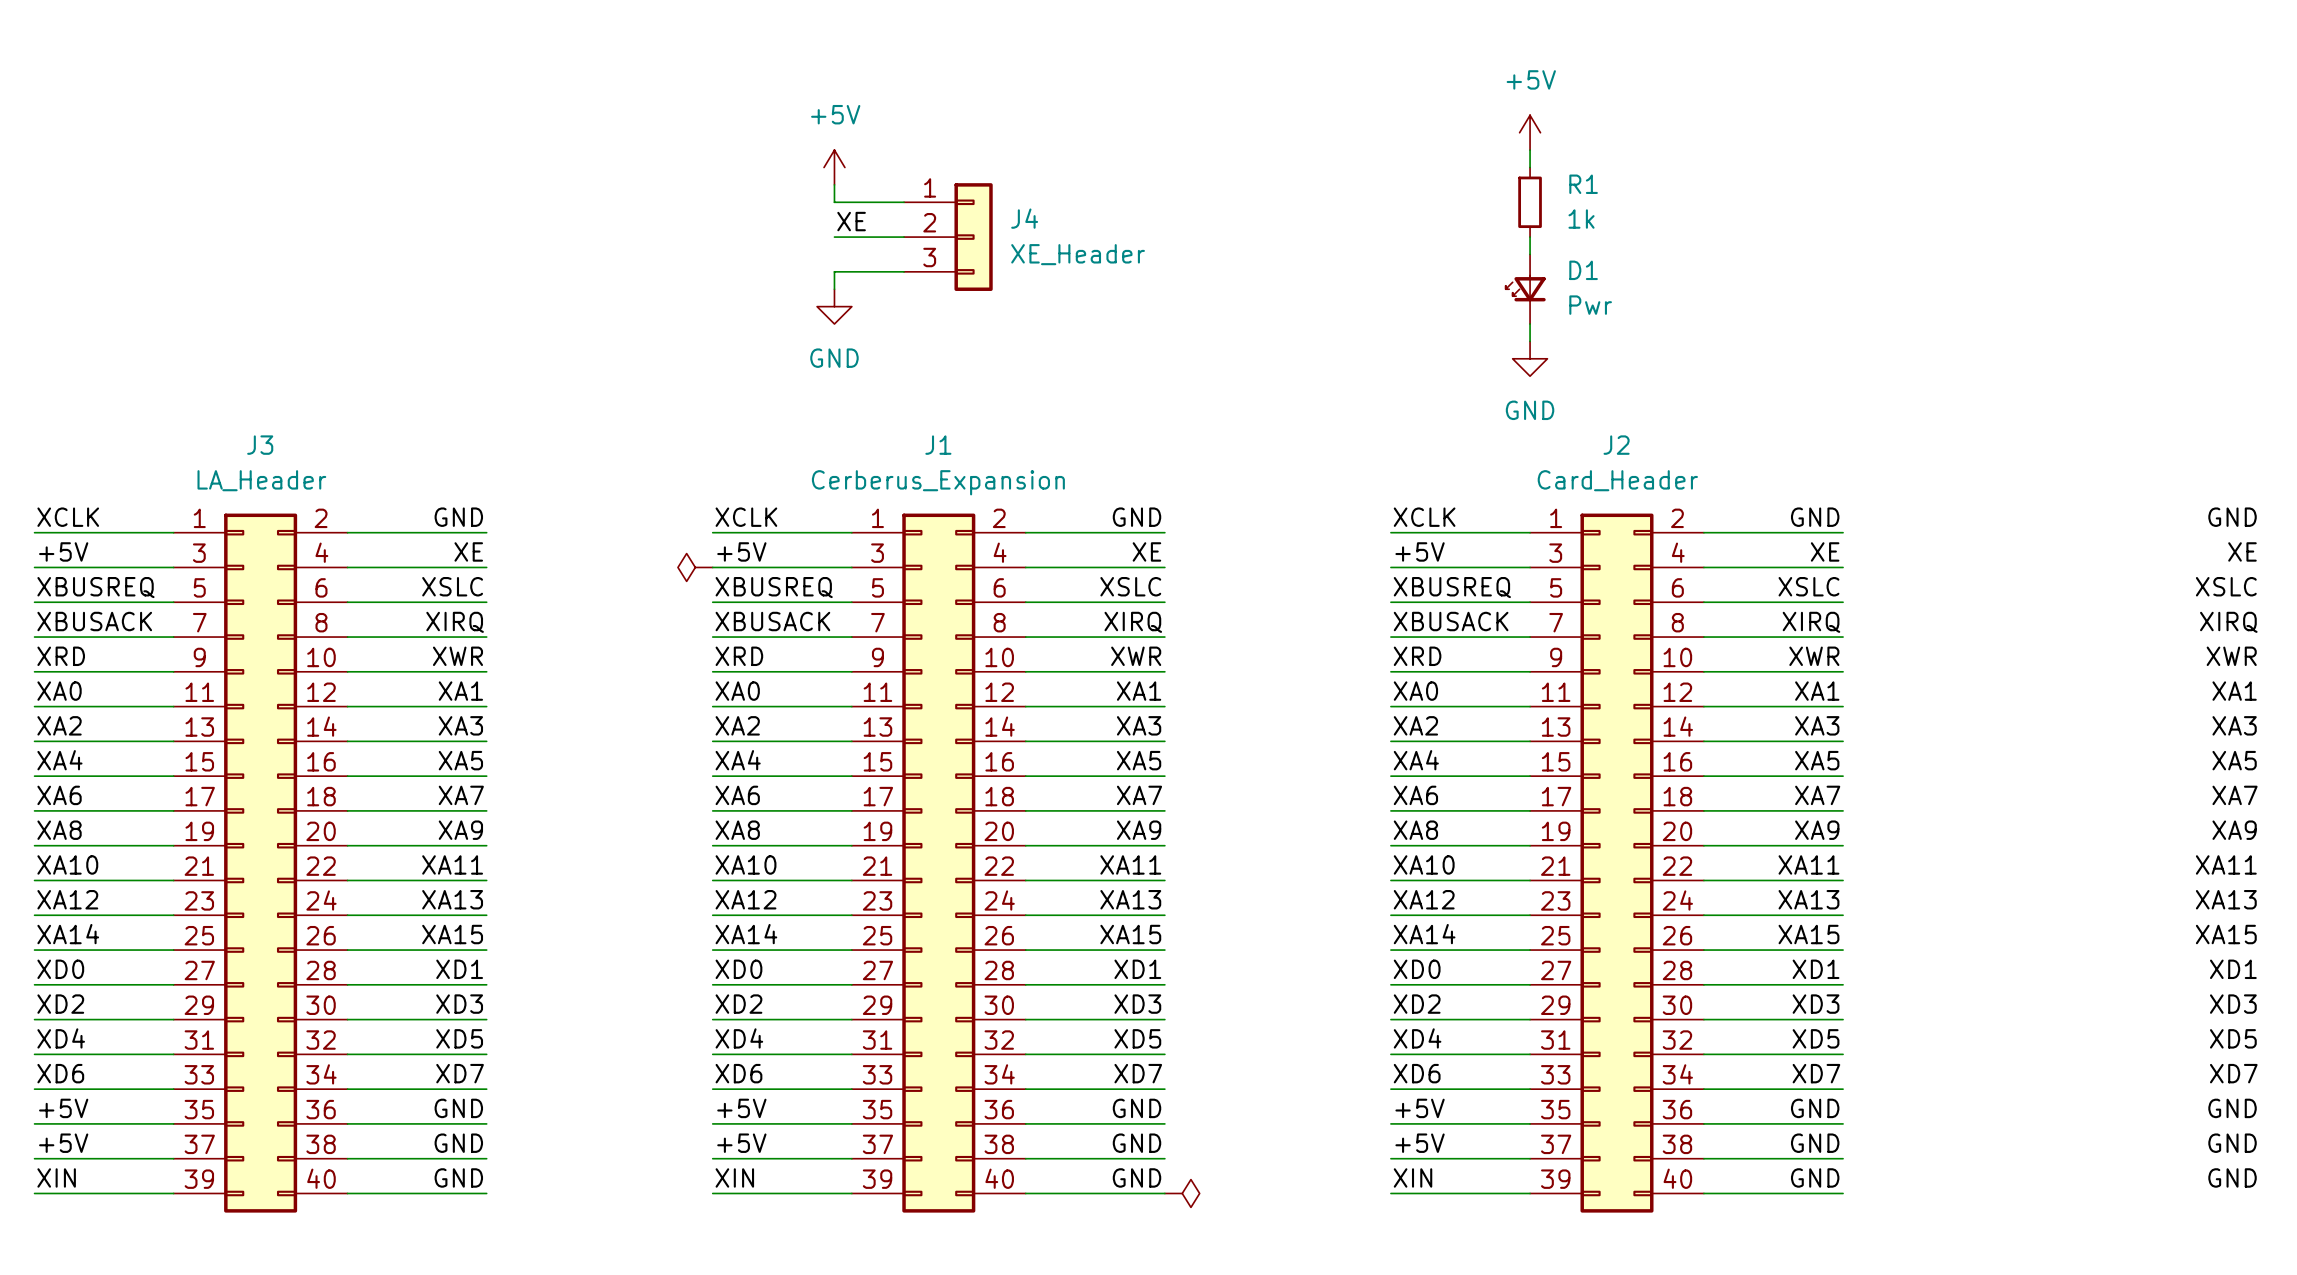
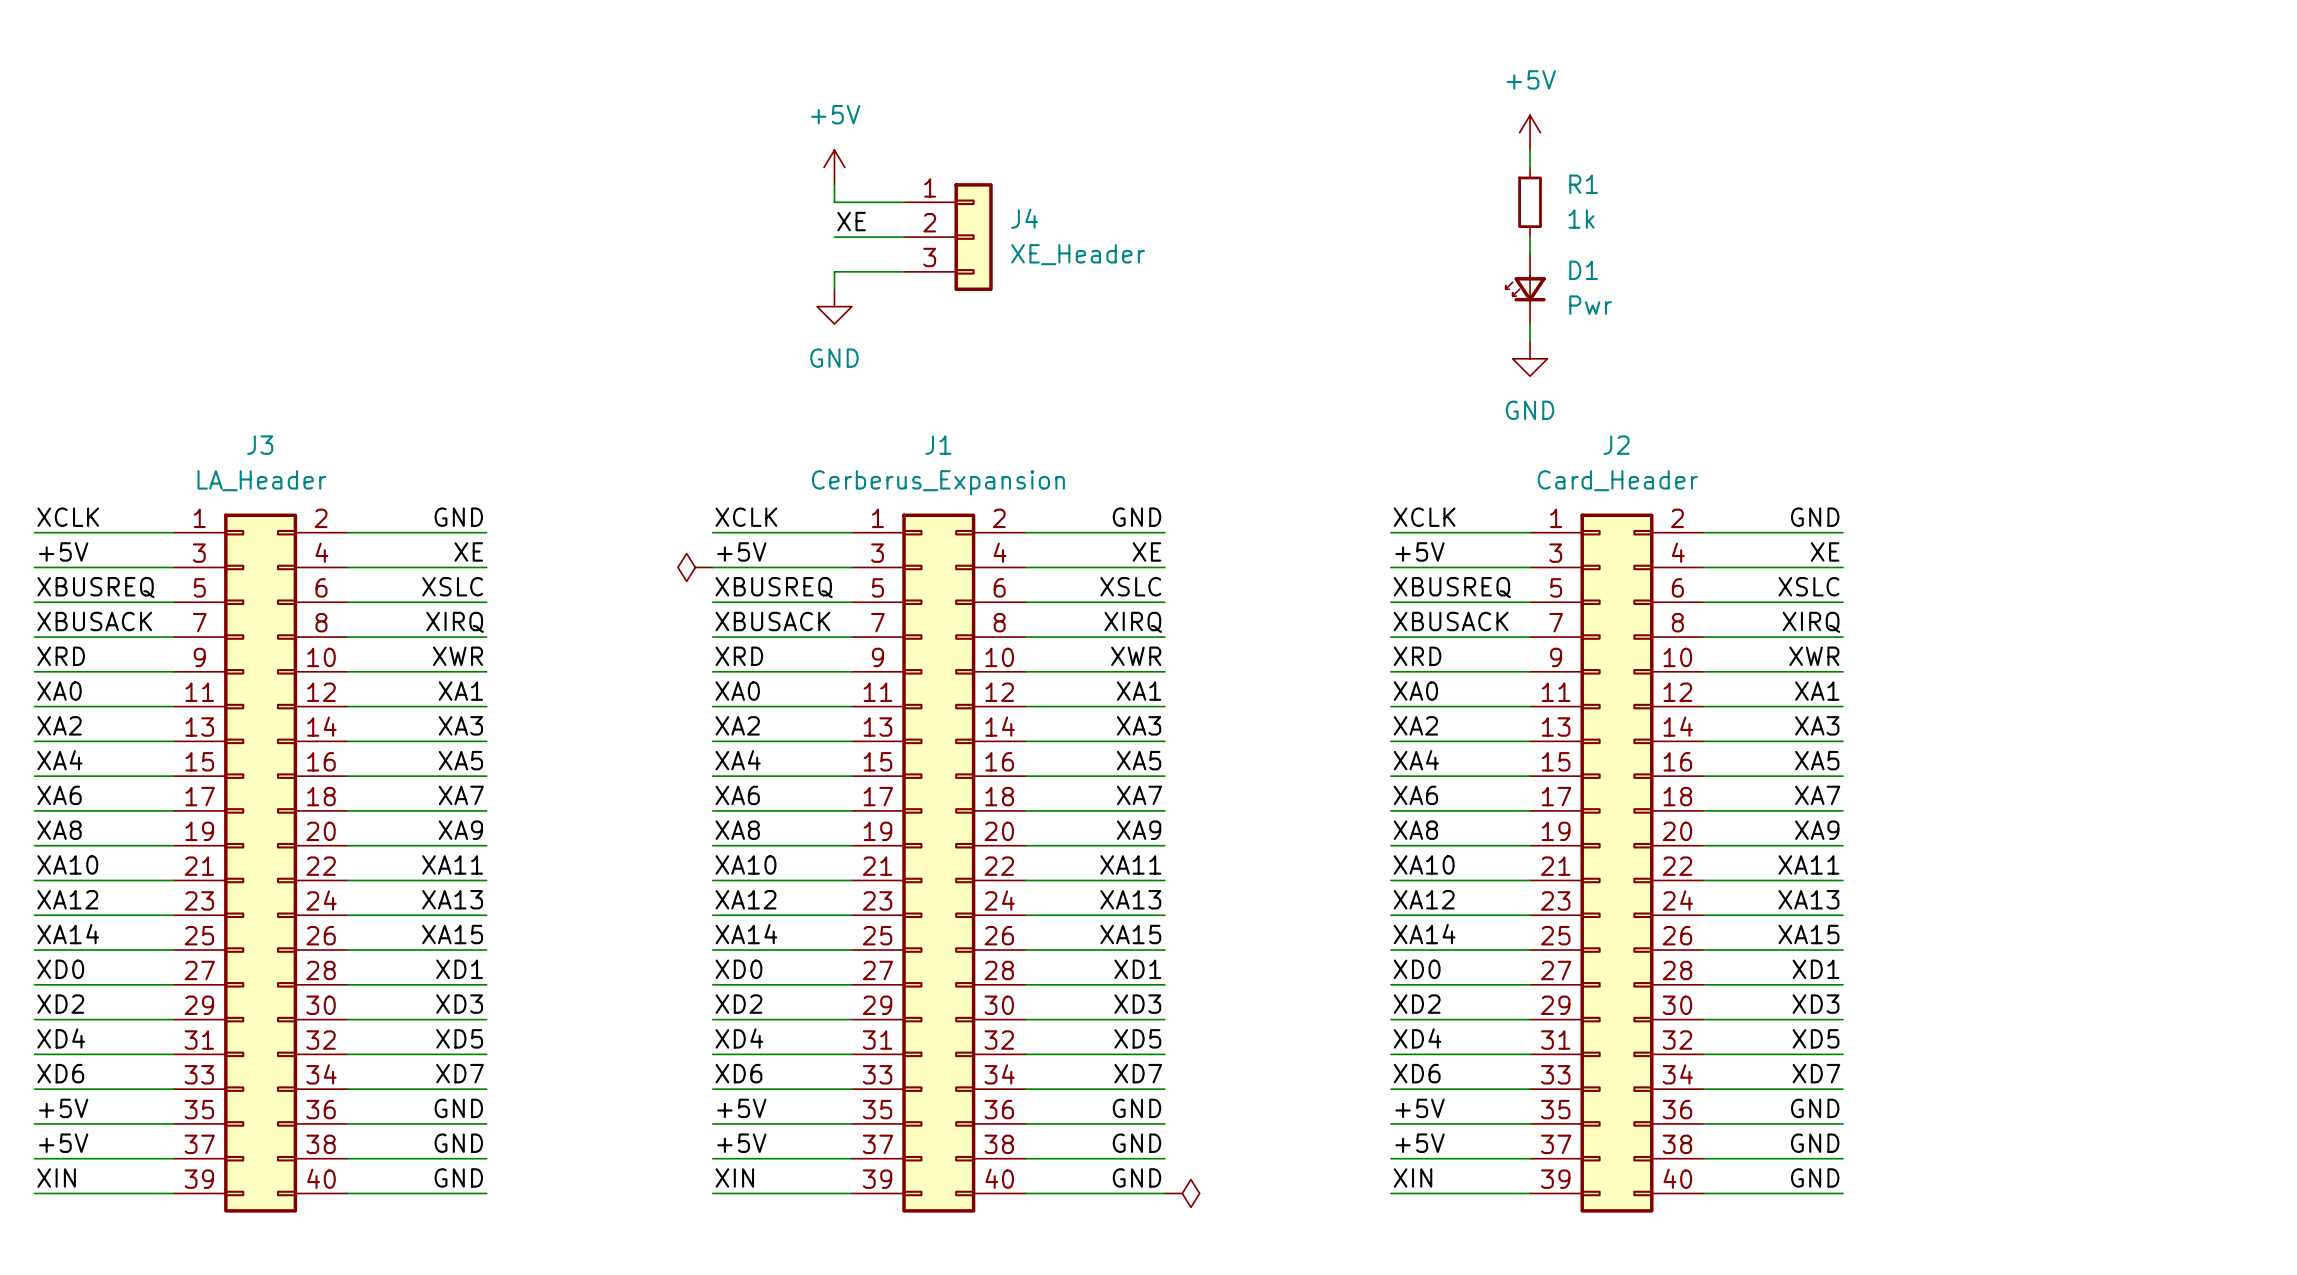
label: GND (2232, 517) -> none
label: XE (2242, 551) -> none
label: XSLC (2226, 586) -> none
label: XIRQ (2228, 622) -> none
label: XWR (2231, 656) -> none
label: XA1 (2234, 691) -> none
label: XA3 (2234, 725) -> none
label: XA5 (2234, 760) -> none
label: XA7 (2235, 795) -> none
label: XA9 (2234, 830) -> none
label: XA11 (2226, 864) -> none
label: XA13 (2226, 899) -> none
label: XA15 (2226, 934) -> none
label: XD1 (2233, 969) -> none
label: XD3 (2233, 1004) -> none
label: XD5 (2233, 1038) -> none
label: XD7 (2233, 1073) -> none
label: GND (2232, 1108) -> none
label: GND (2232, 1143) -> none
label: GND (2232, 1177) -> none

